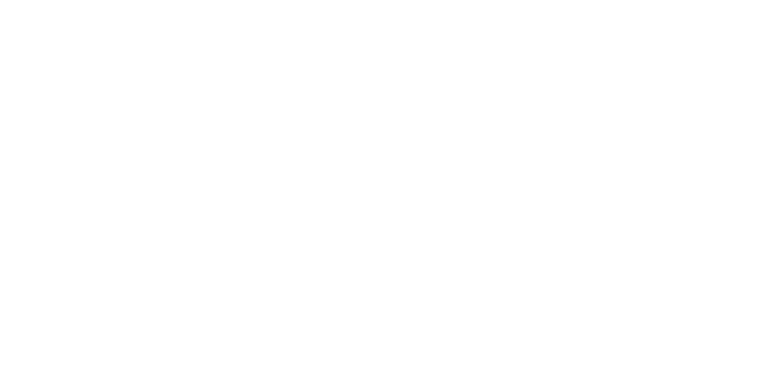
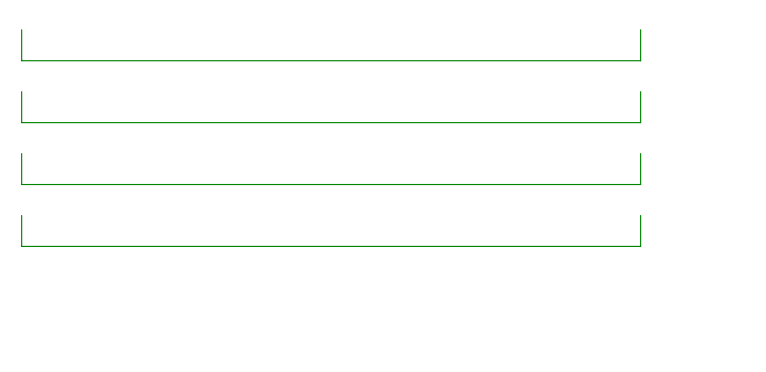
wire: none -> (21, 29) (21, 60) (640, 60) (640, 29)
wire: none -> (21, 91) (21, 122) (640, 122) (640, 91)
wire: none -> (21, 153) (21, 184) (640, 184) (640, 153)
wire: none -> (21, 215) (21, 246) (640, 246) (640, 215)

